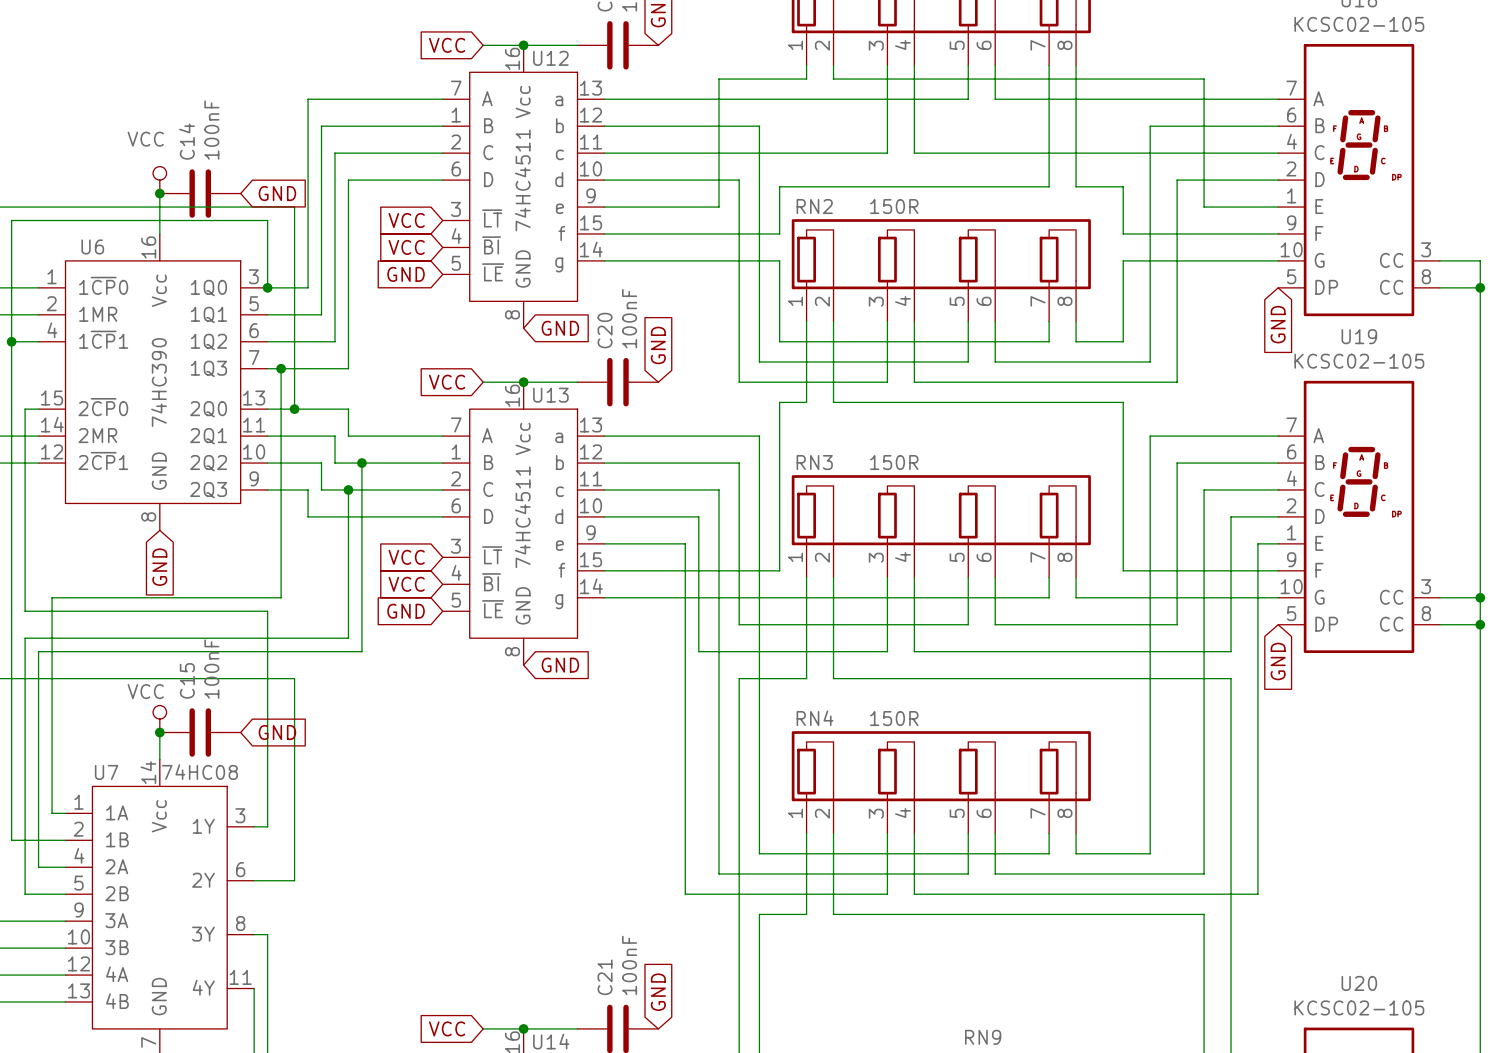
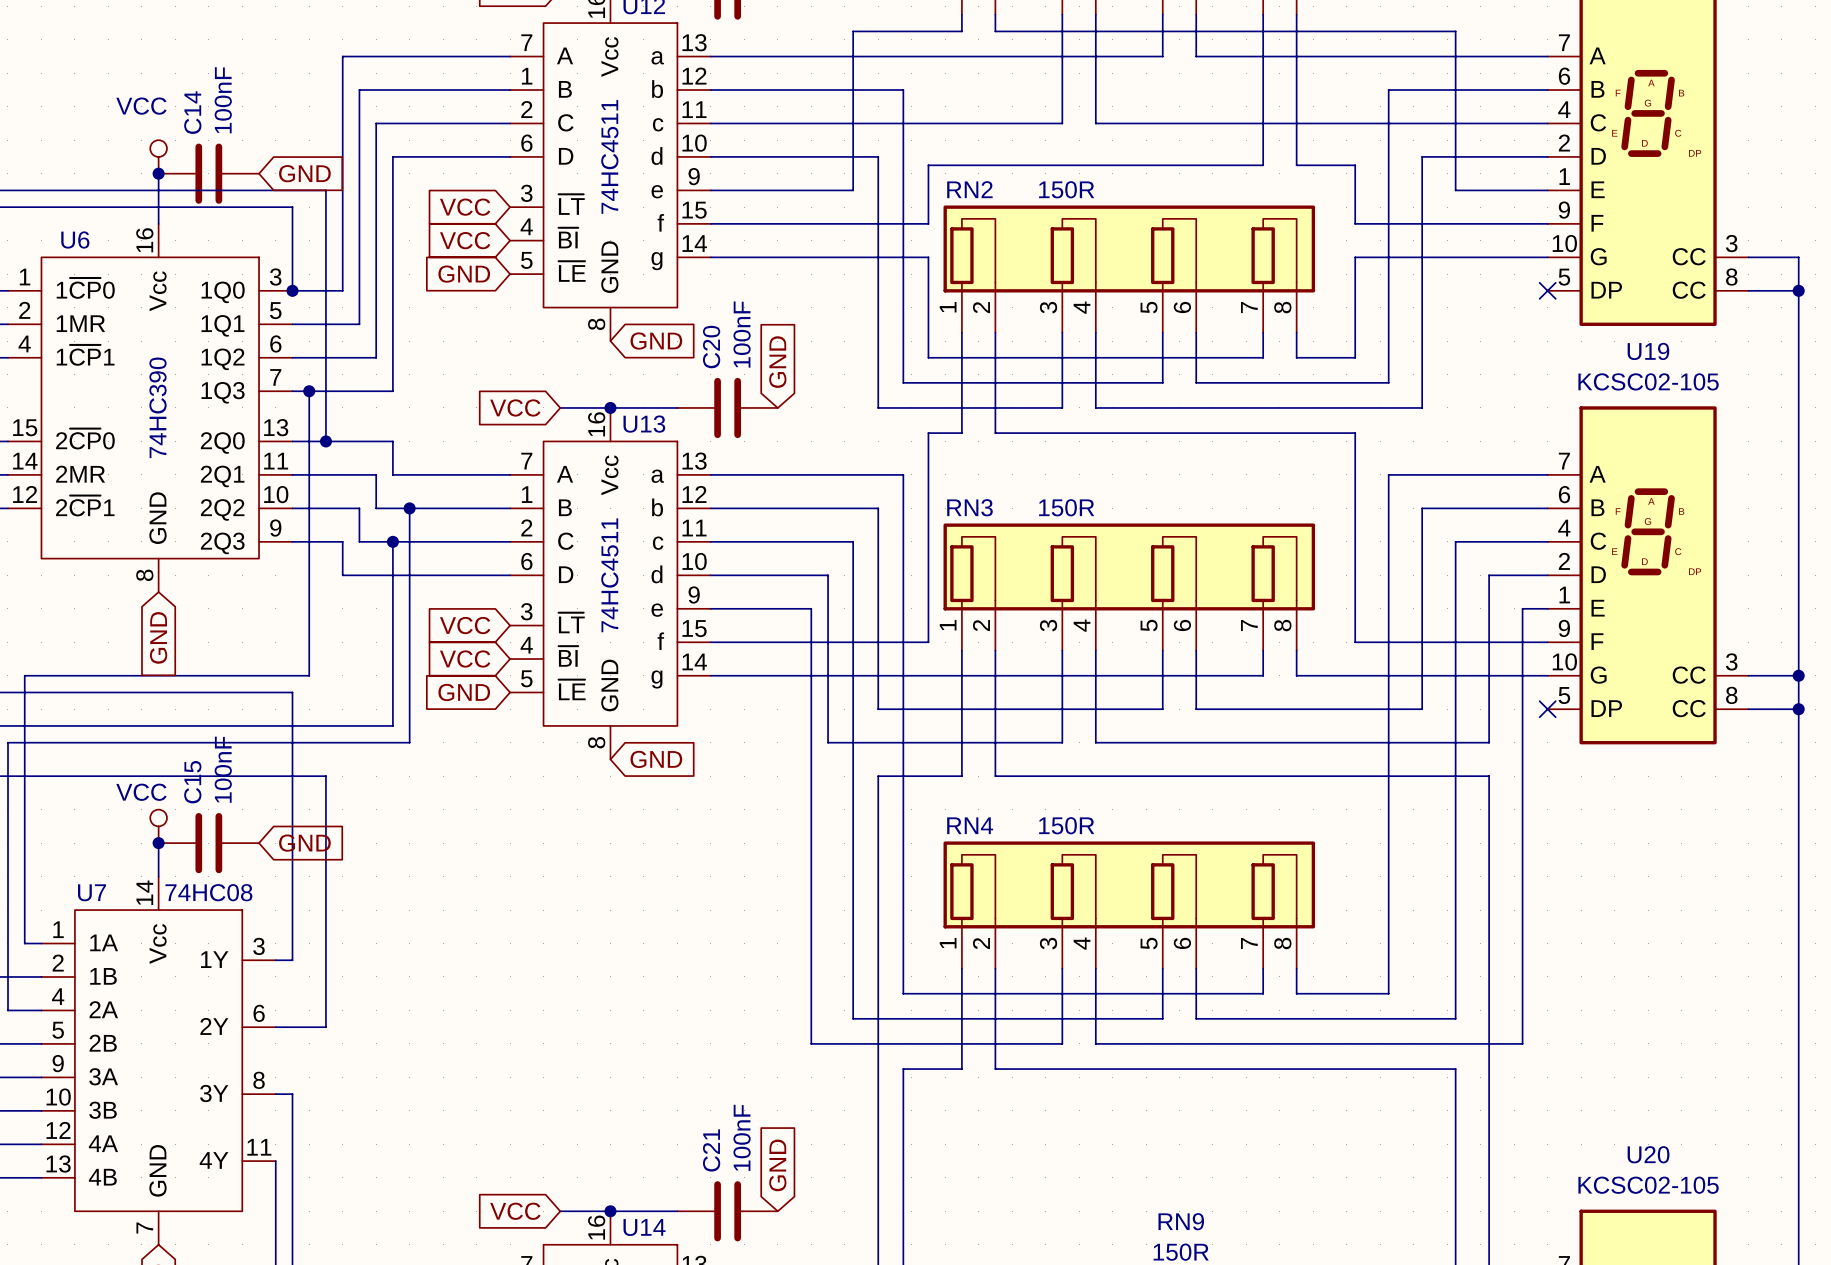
no-connect mark: none -> (1547, 290)
global label: GND (1278, 324) -> none
no-connect mark: none -> (1547, 709)
global label: GND (1278, 661) -> none

